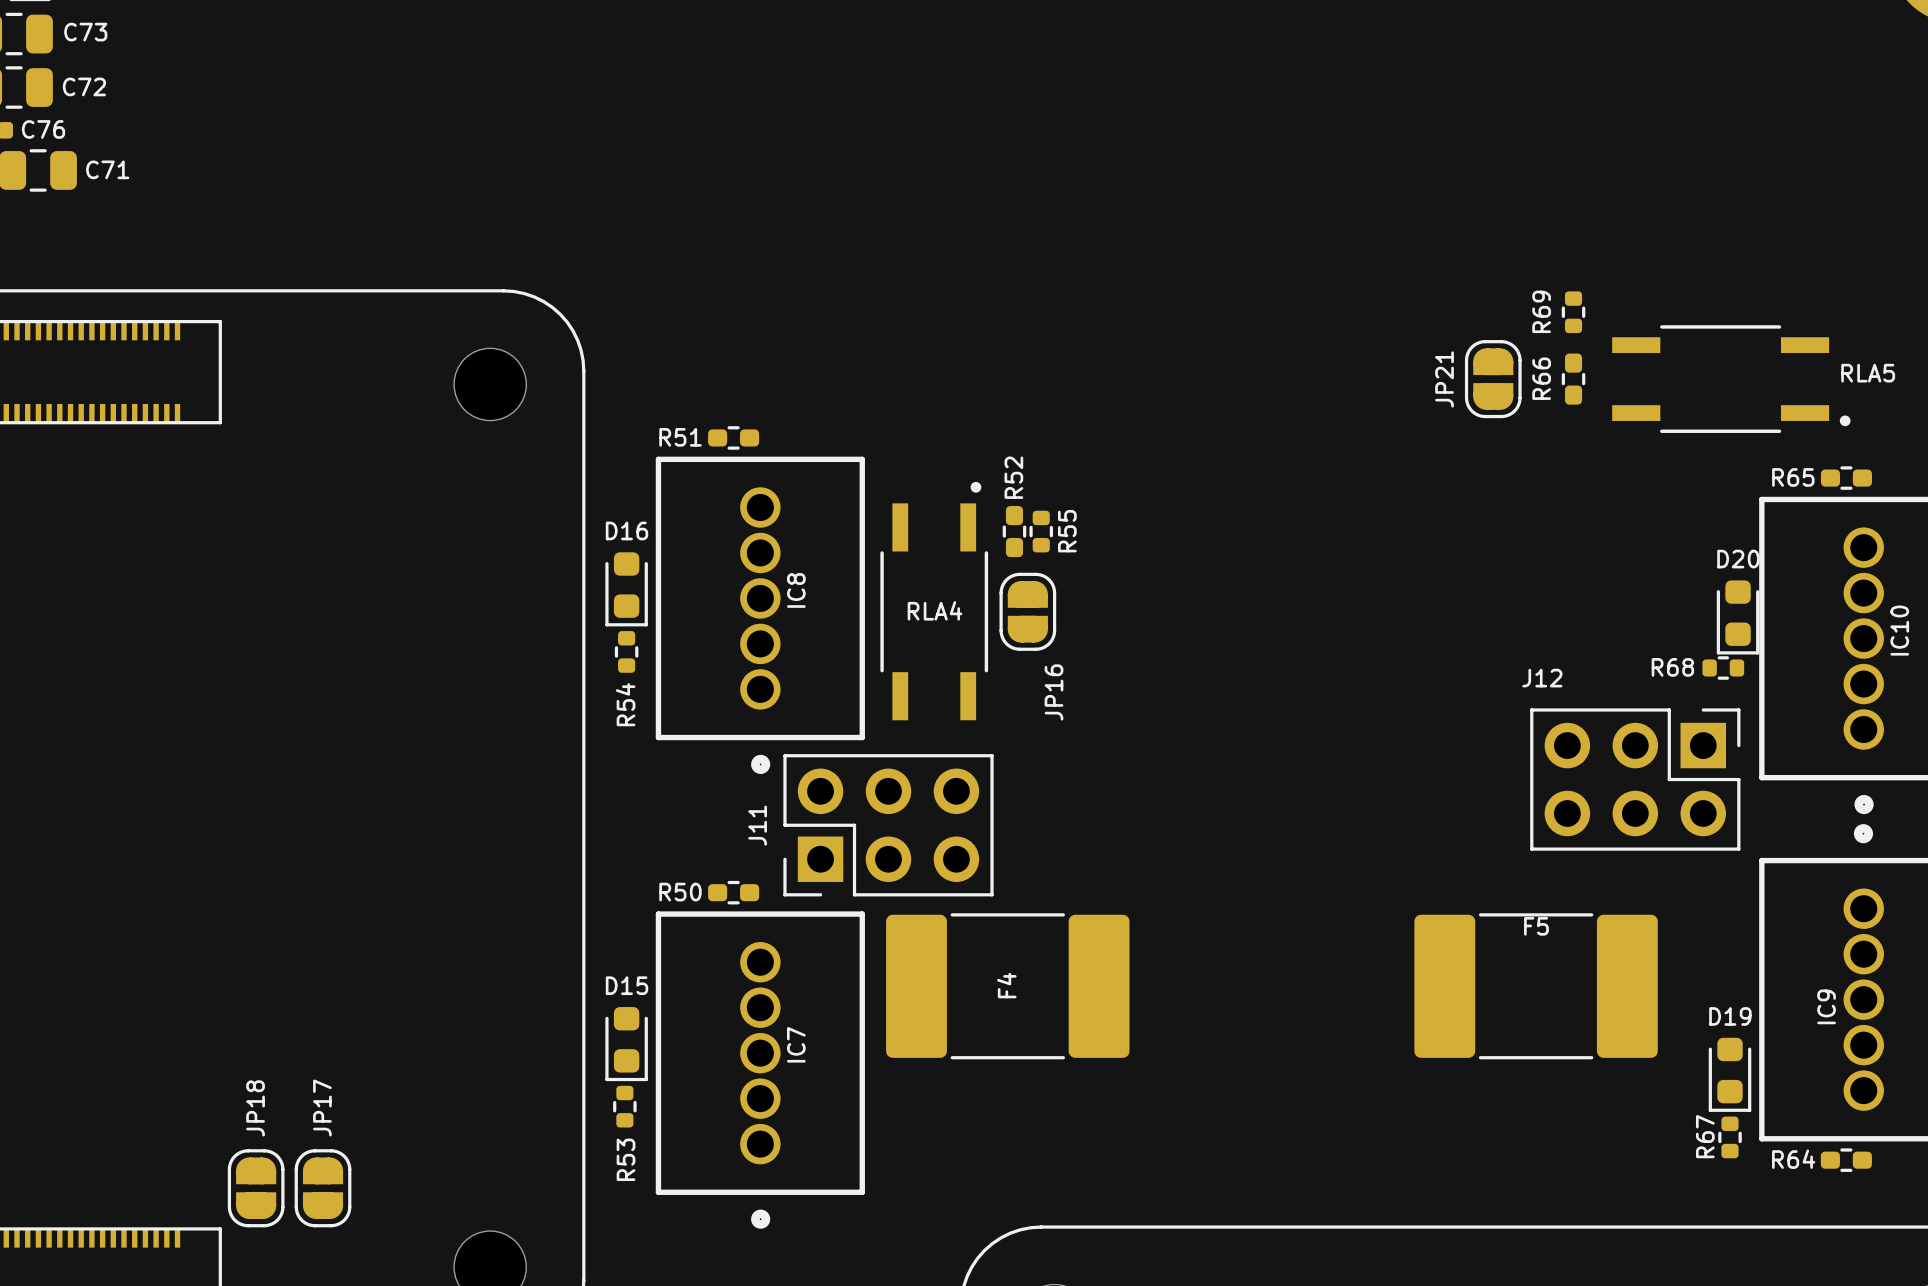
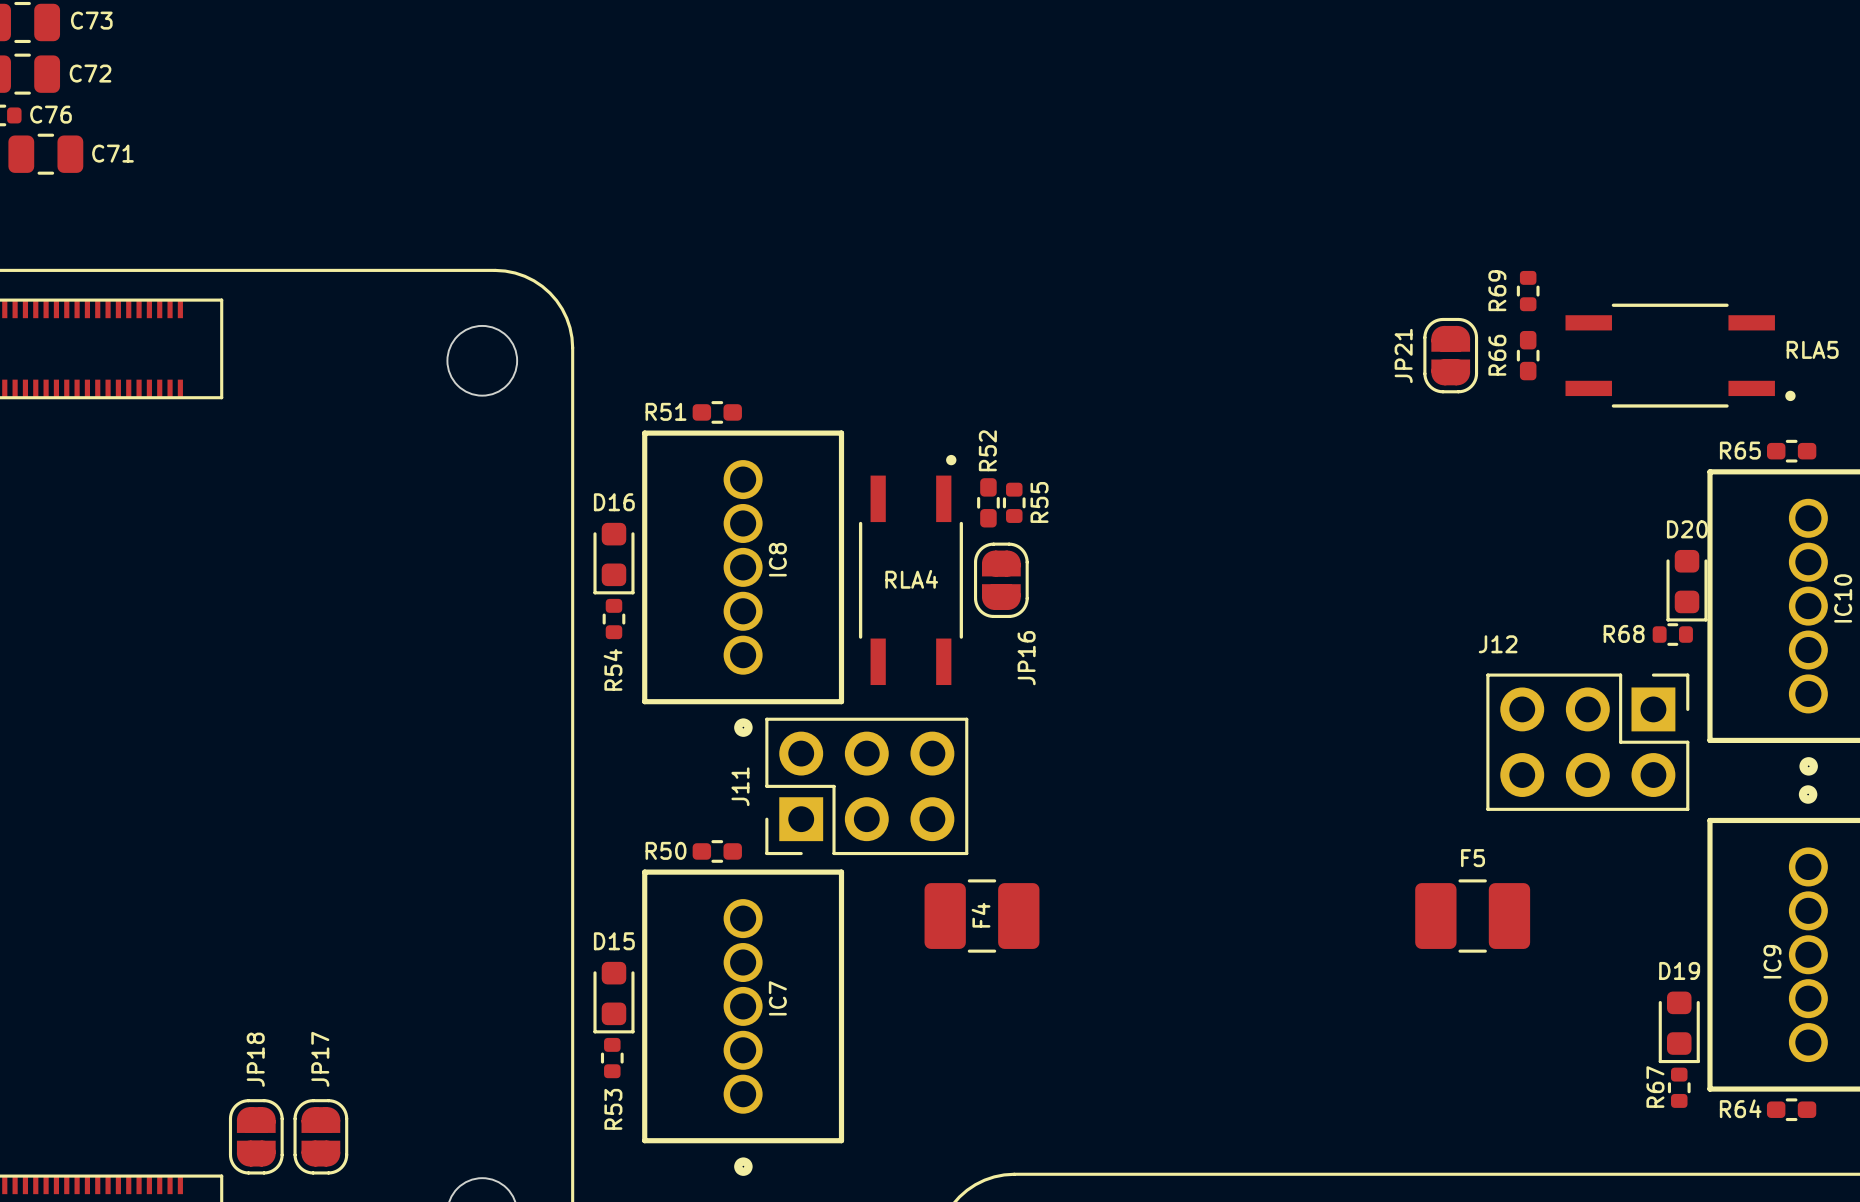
F4 footprint: [886, 913, 1130, 1060] -> [924, 879, 1040, 953]
F5 footprint: [1414, 913, 1658, 1060] -> [1415, 879, 1531, 953]

